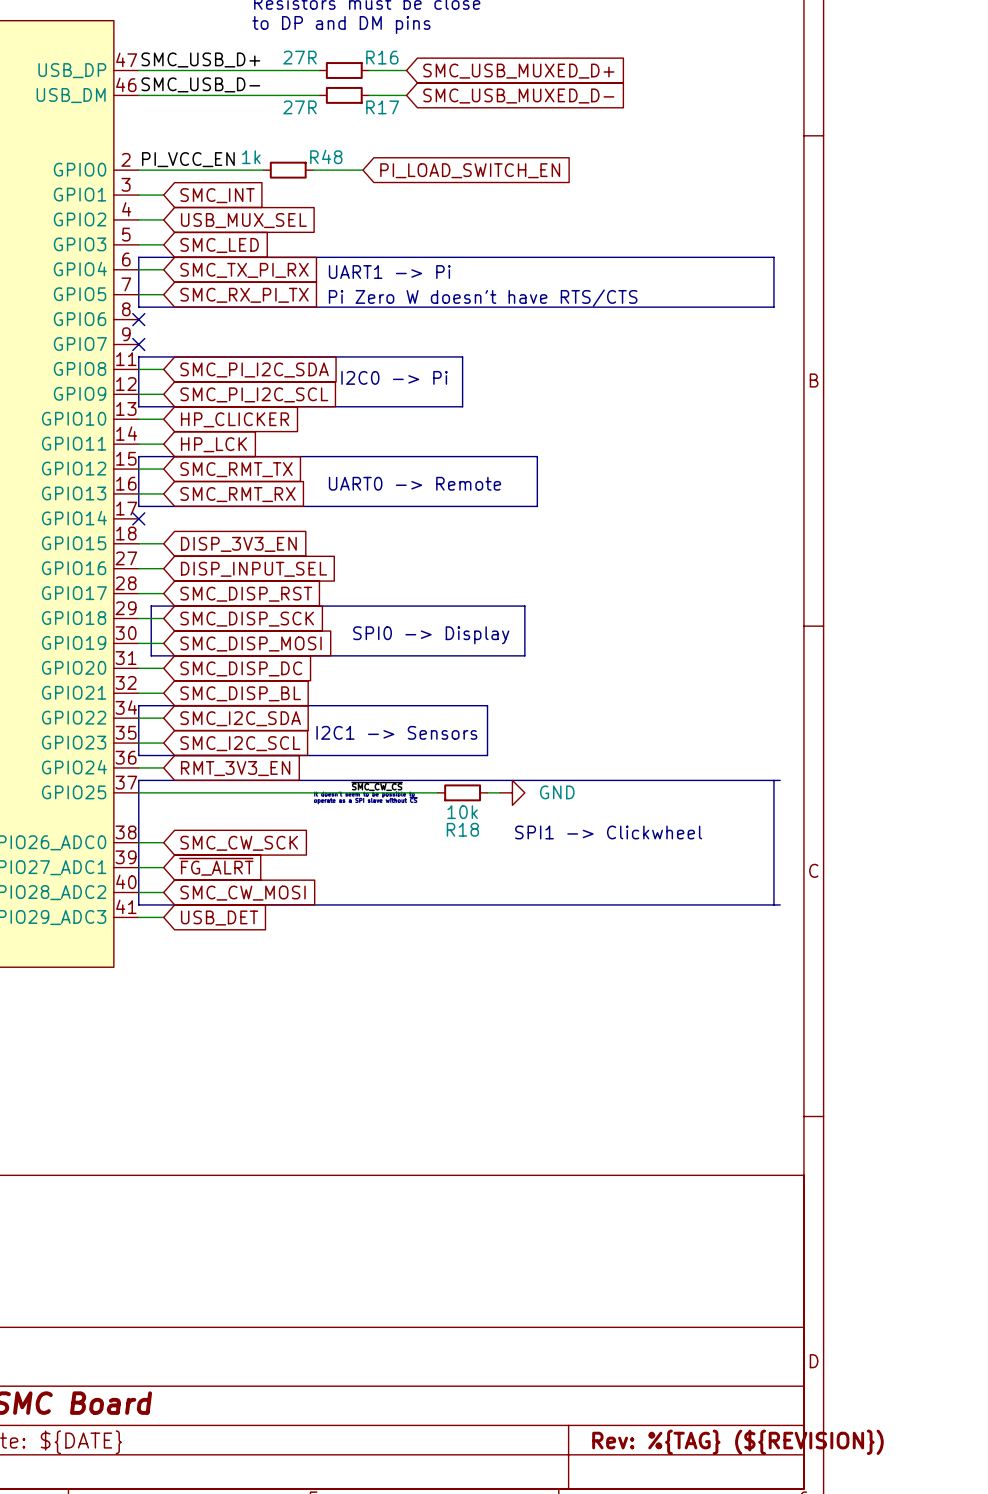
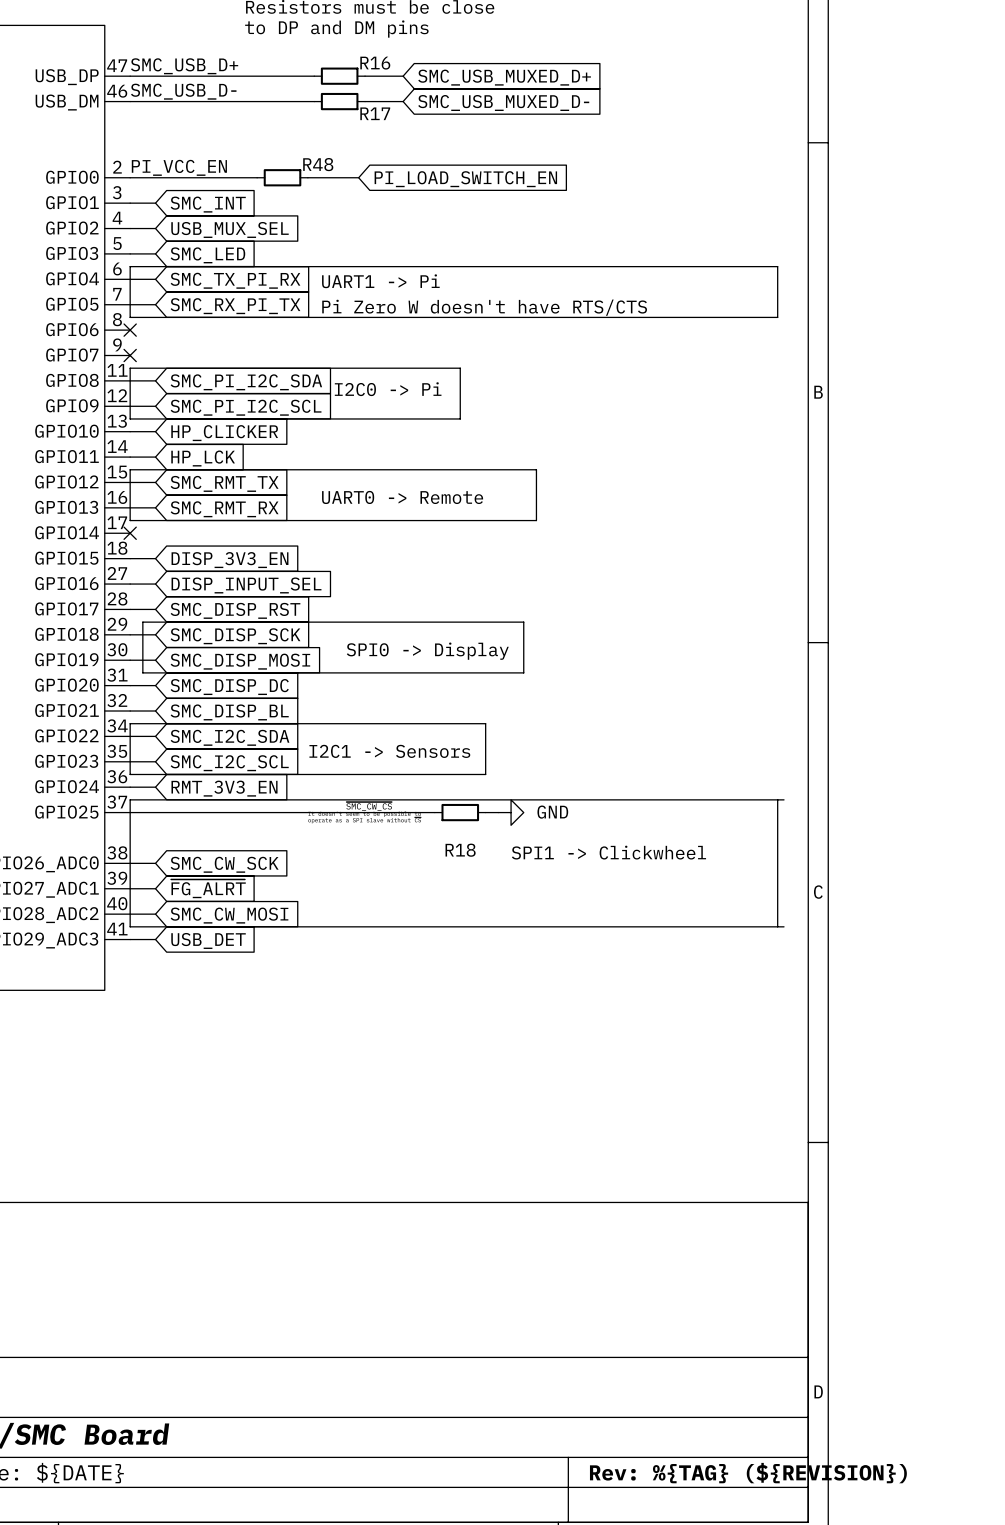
R16 value: 27R (300, 57) -> none
R17 value: 27R (300, 107) -> none
R48 value: 1k (251, 157) -> none
R18 value: 10k (462, 812) -> none

